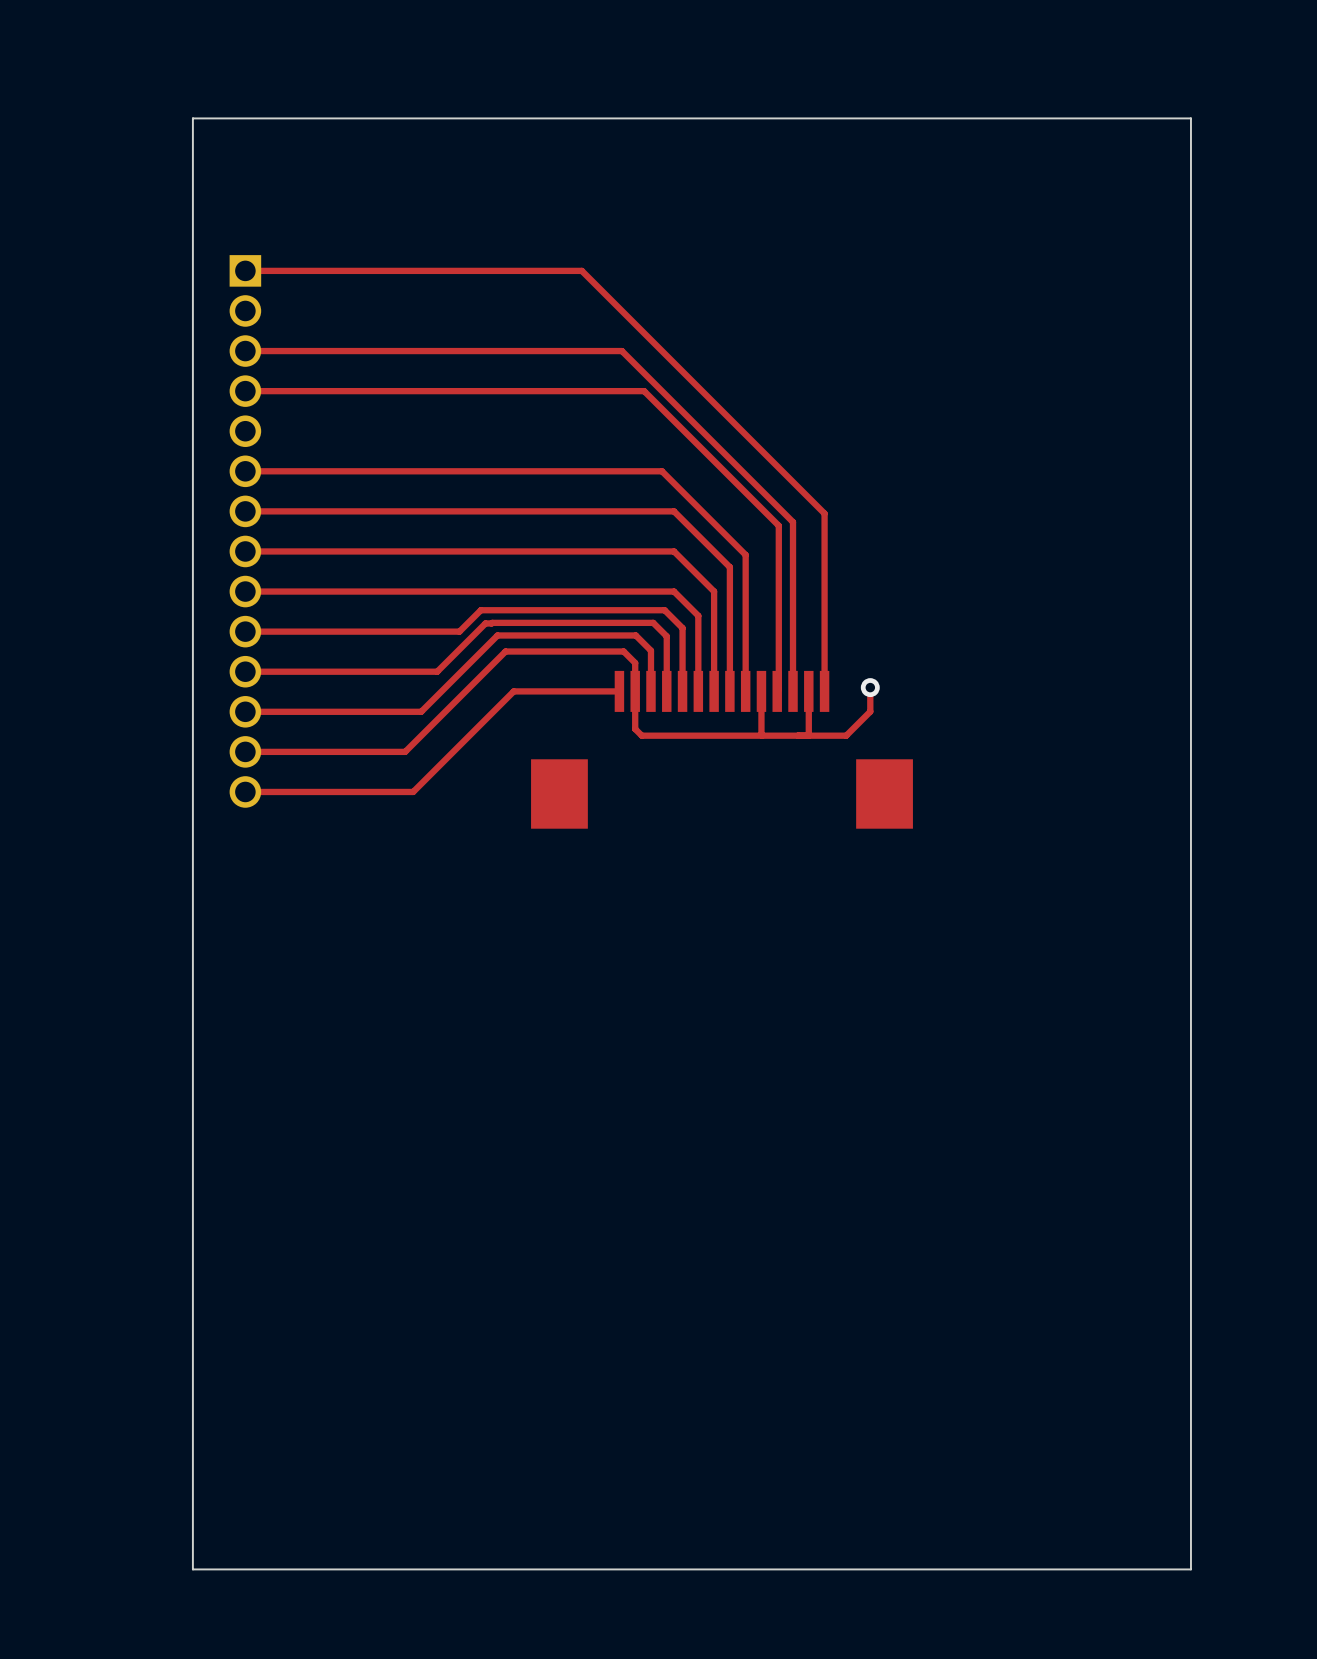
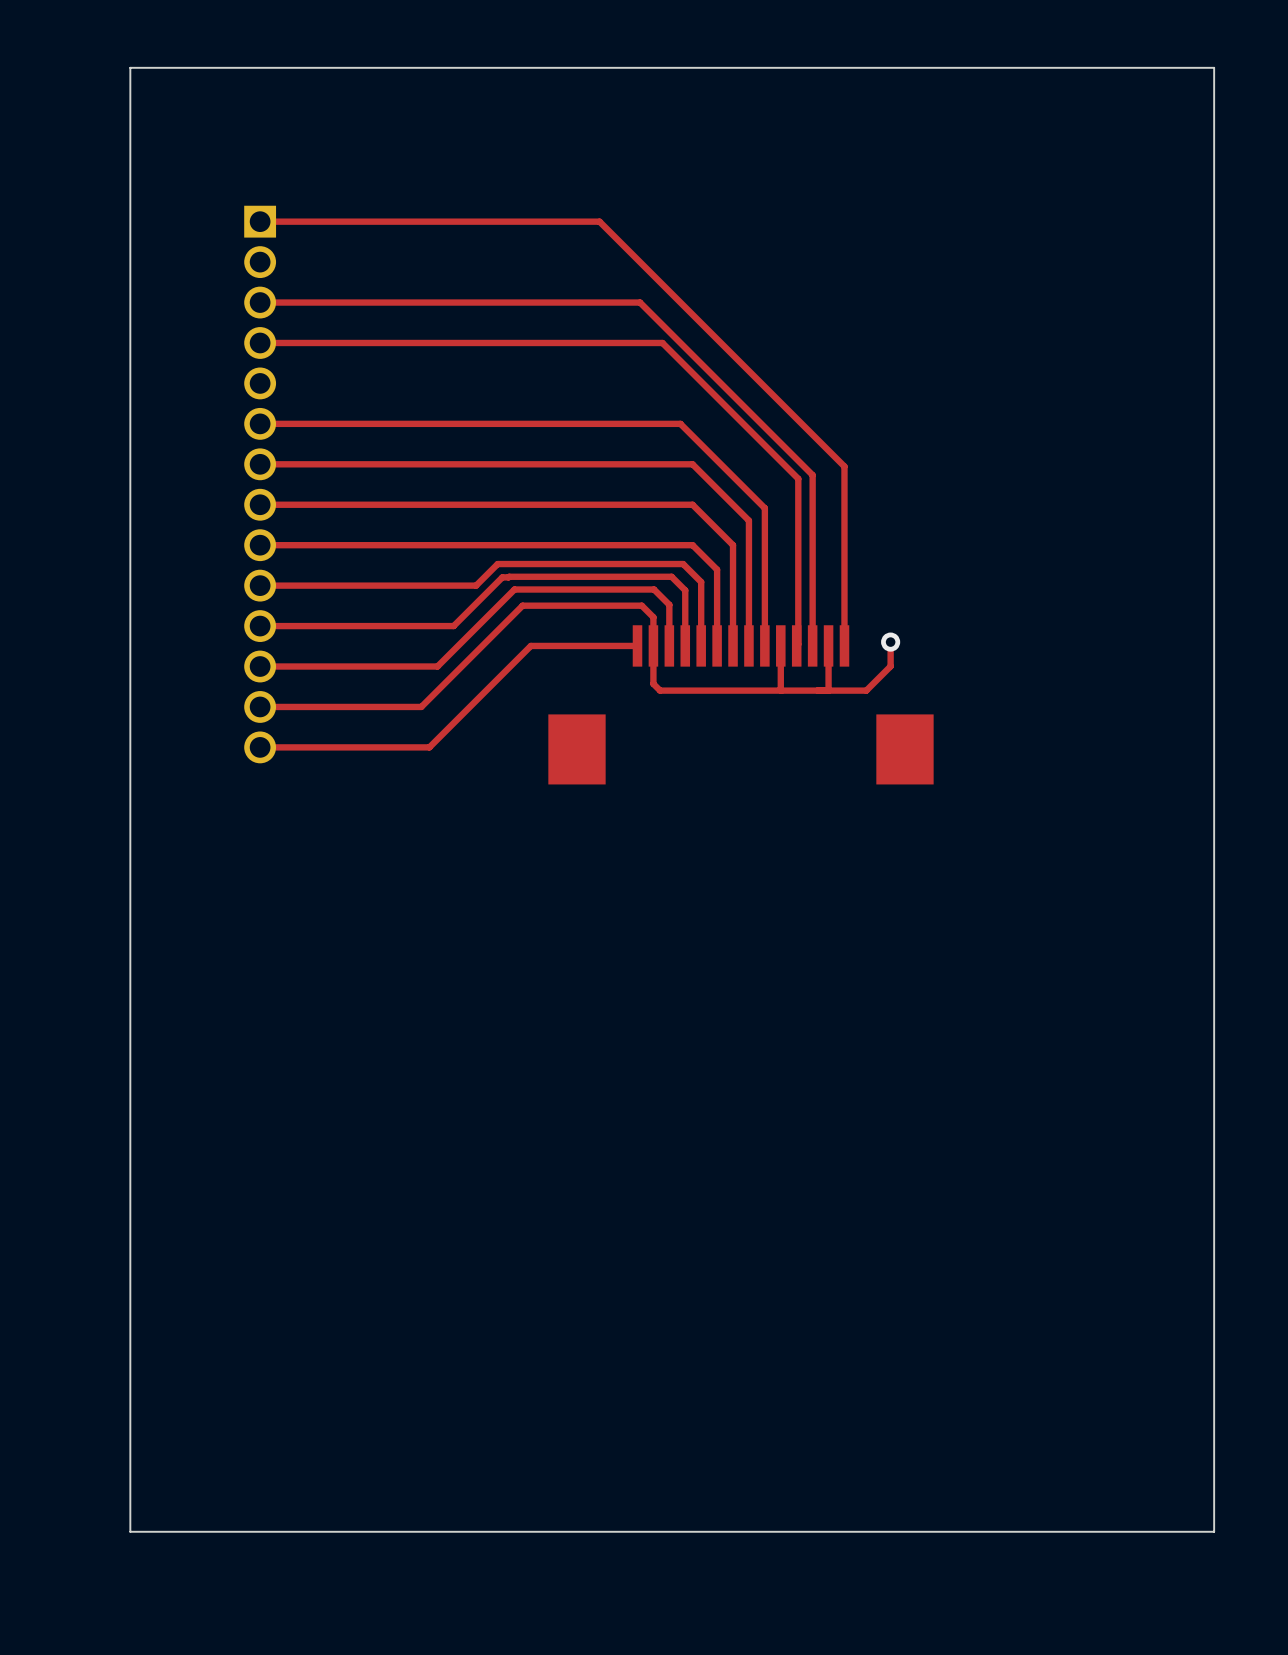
board edge: (192, 118) (192, 1569) -> (207, 67) (130, 67) (130, 1531) (207, 1531)

